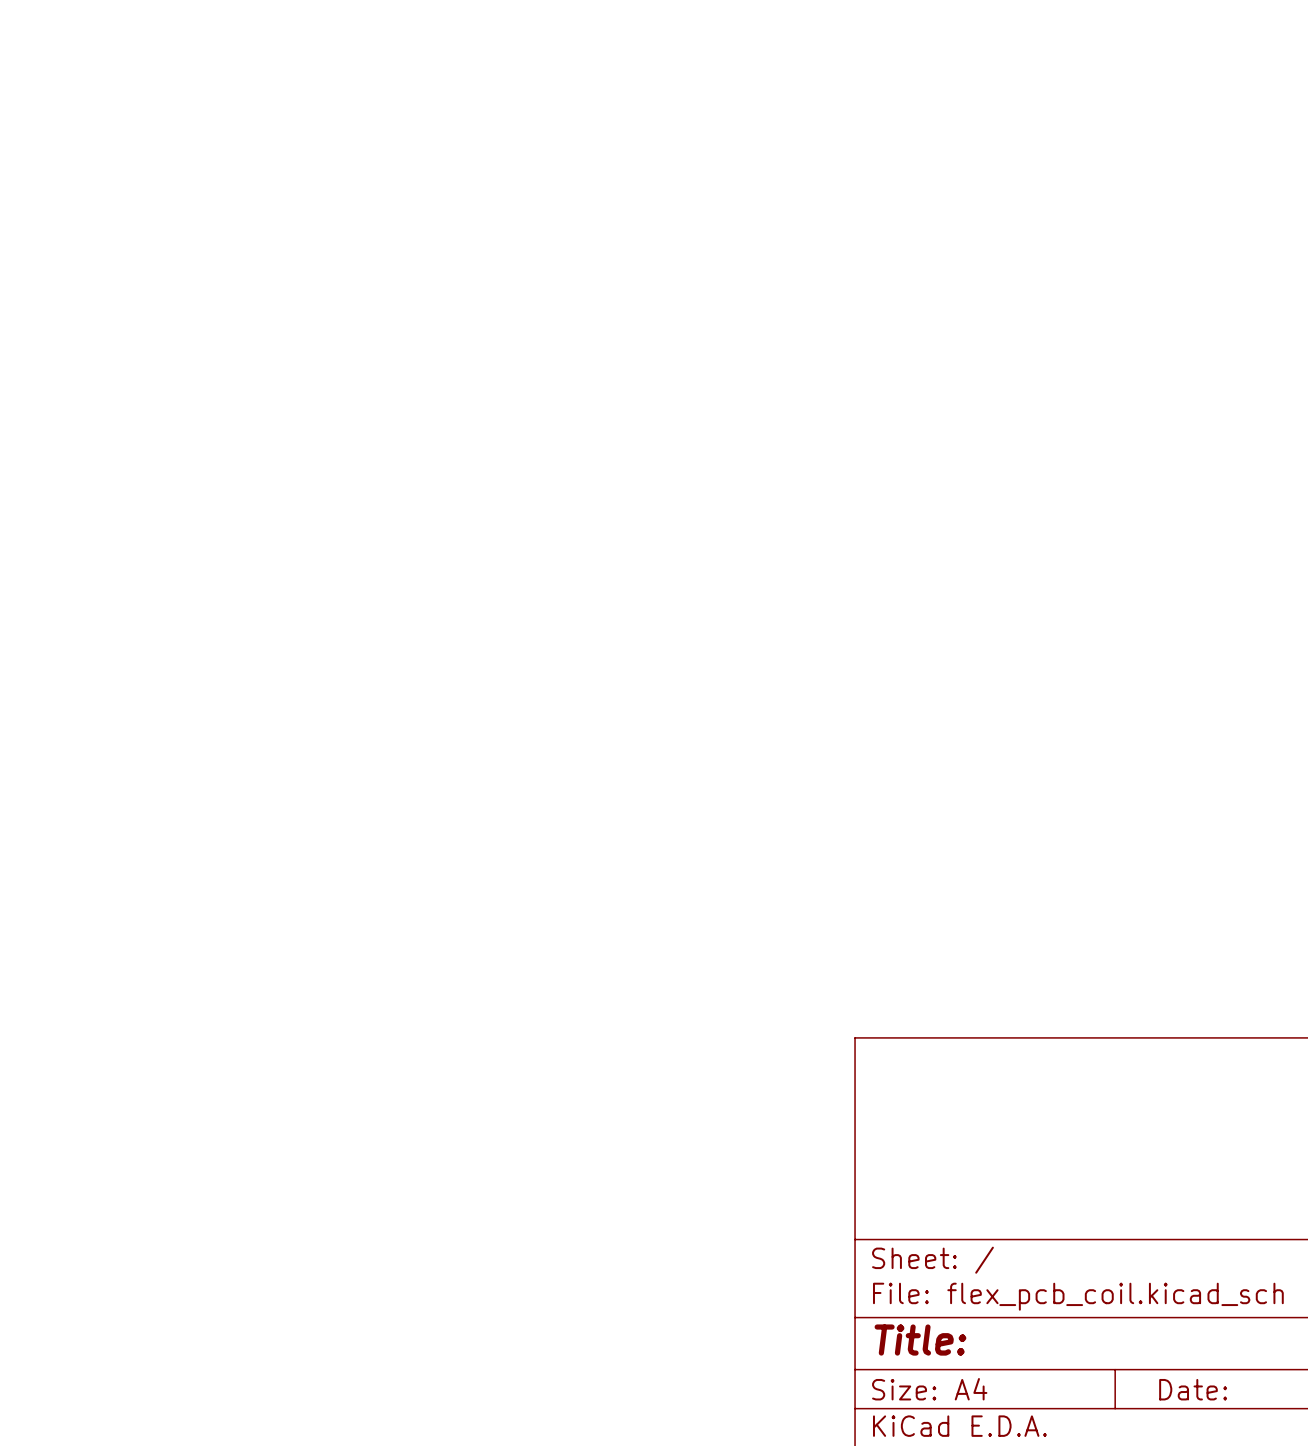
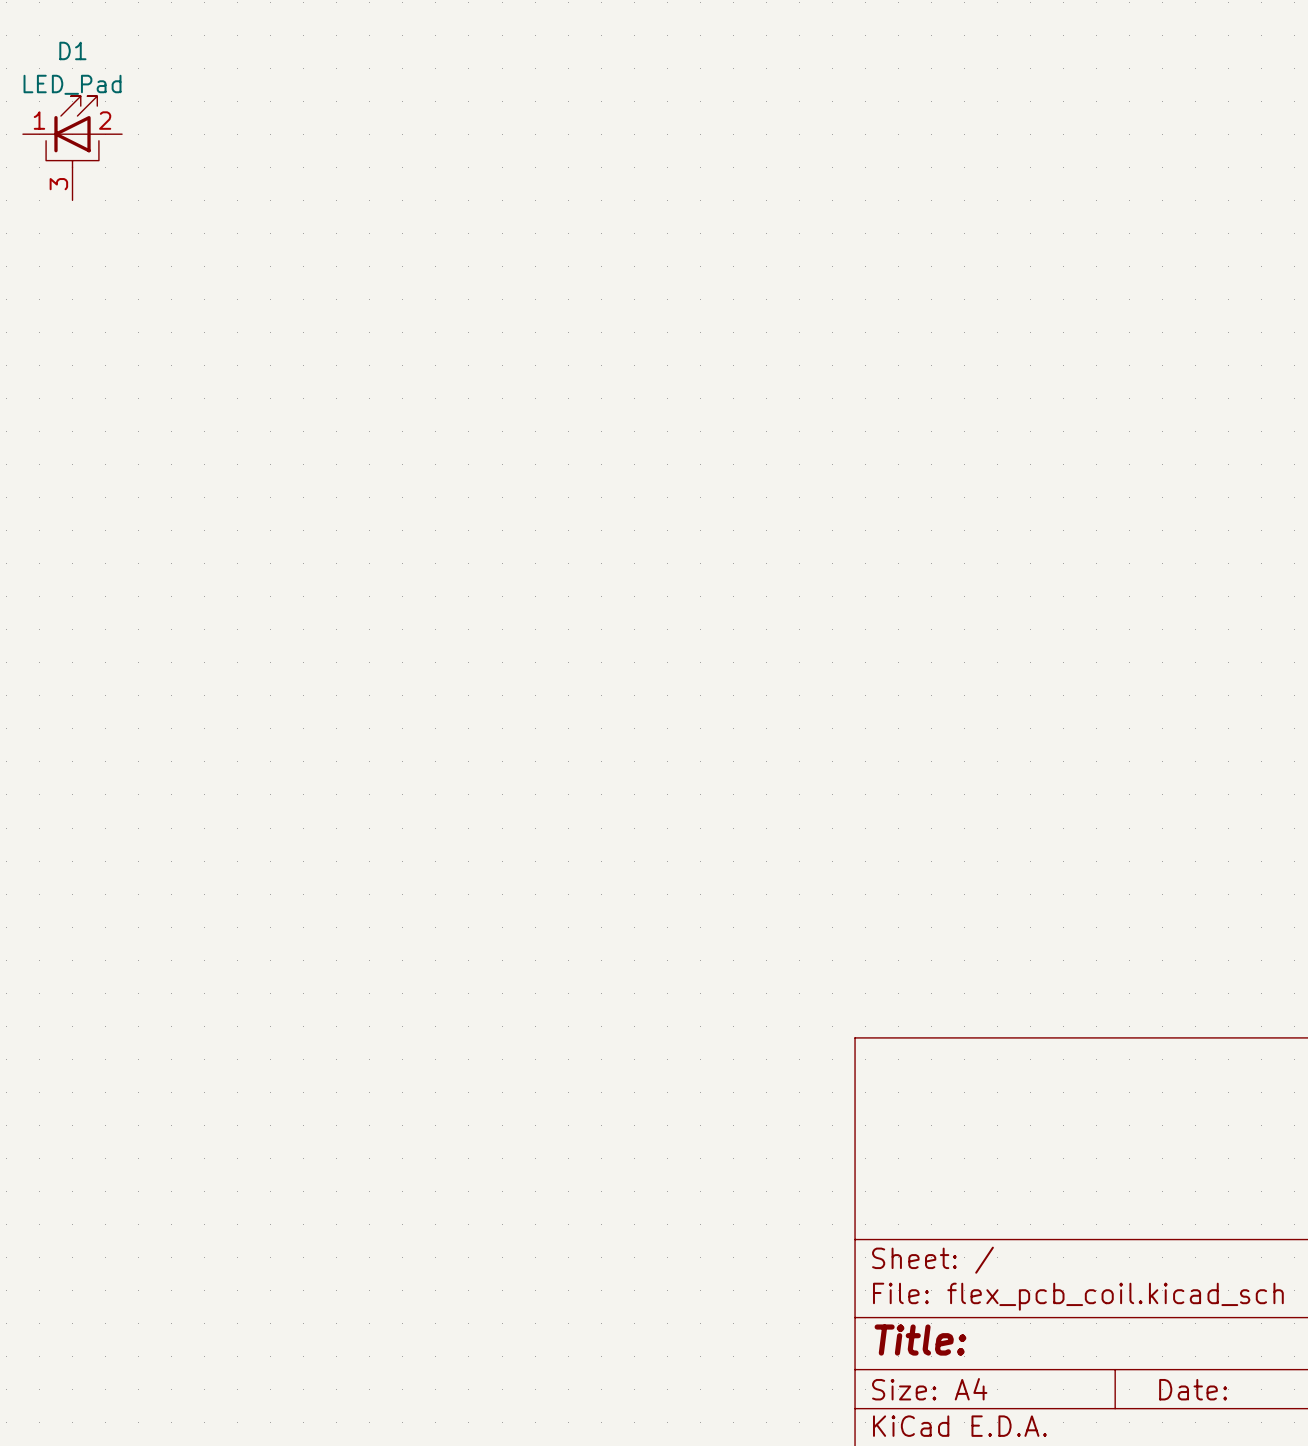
D1: none -> LED_Pad (72, 148)

